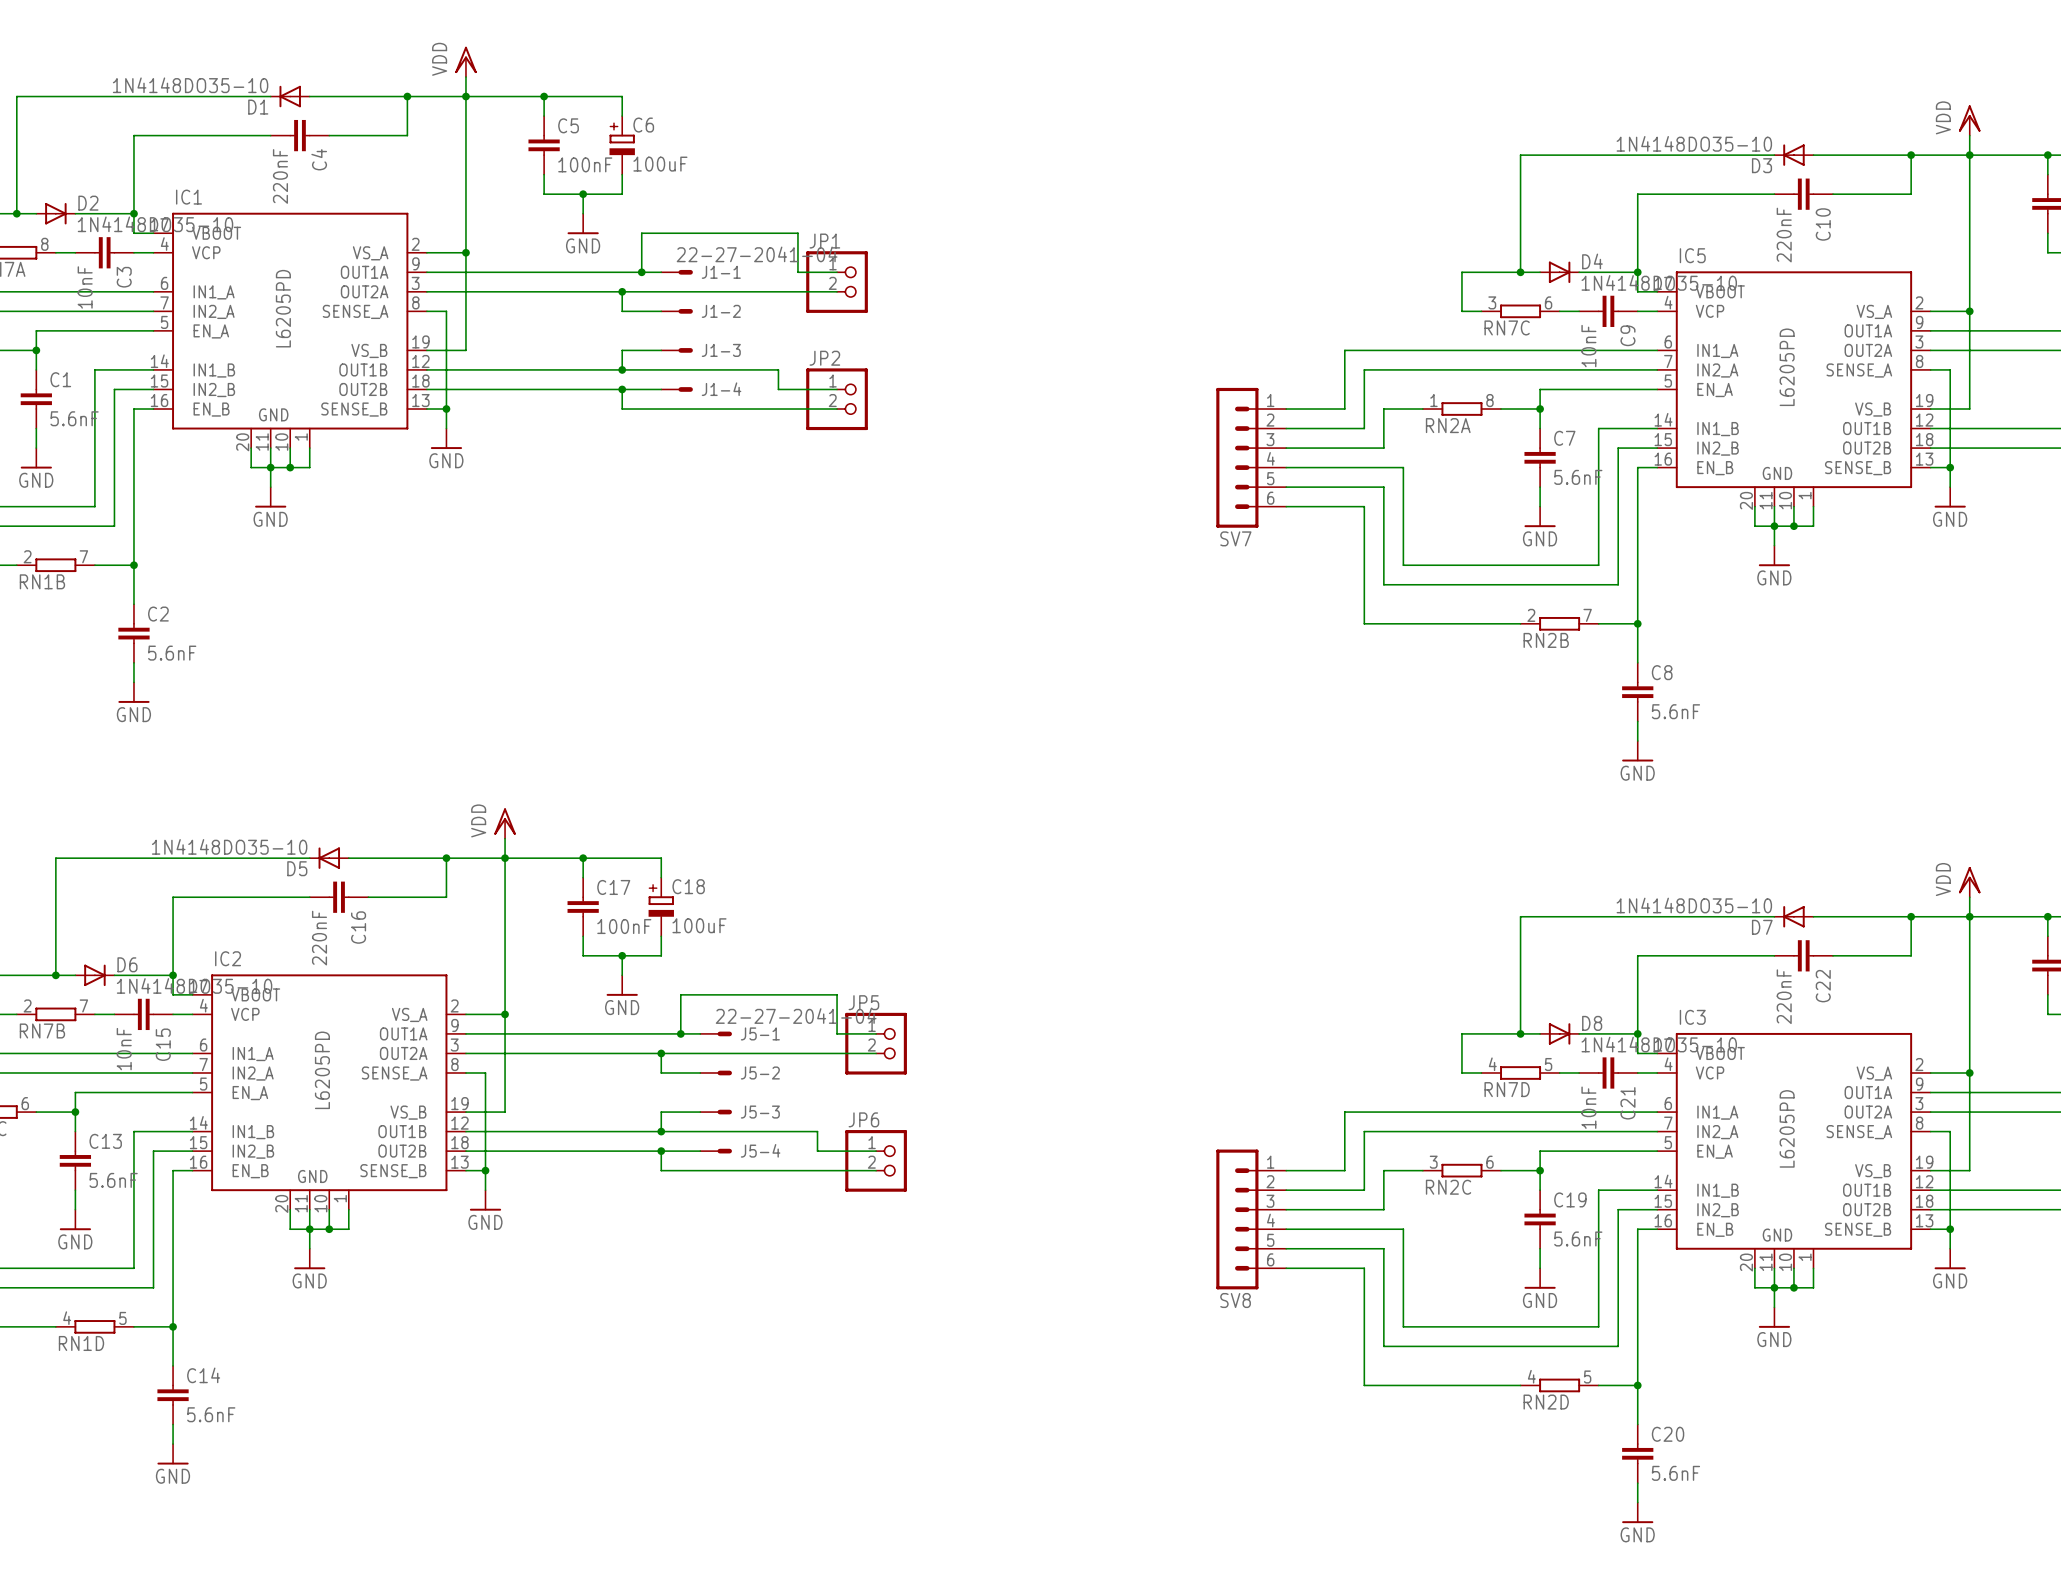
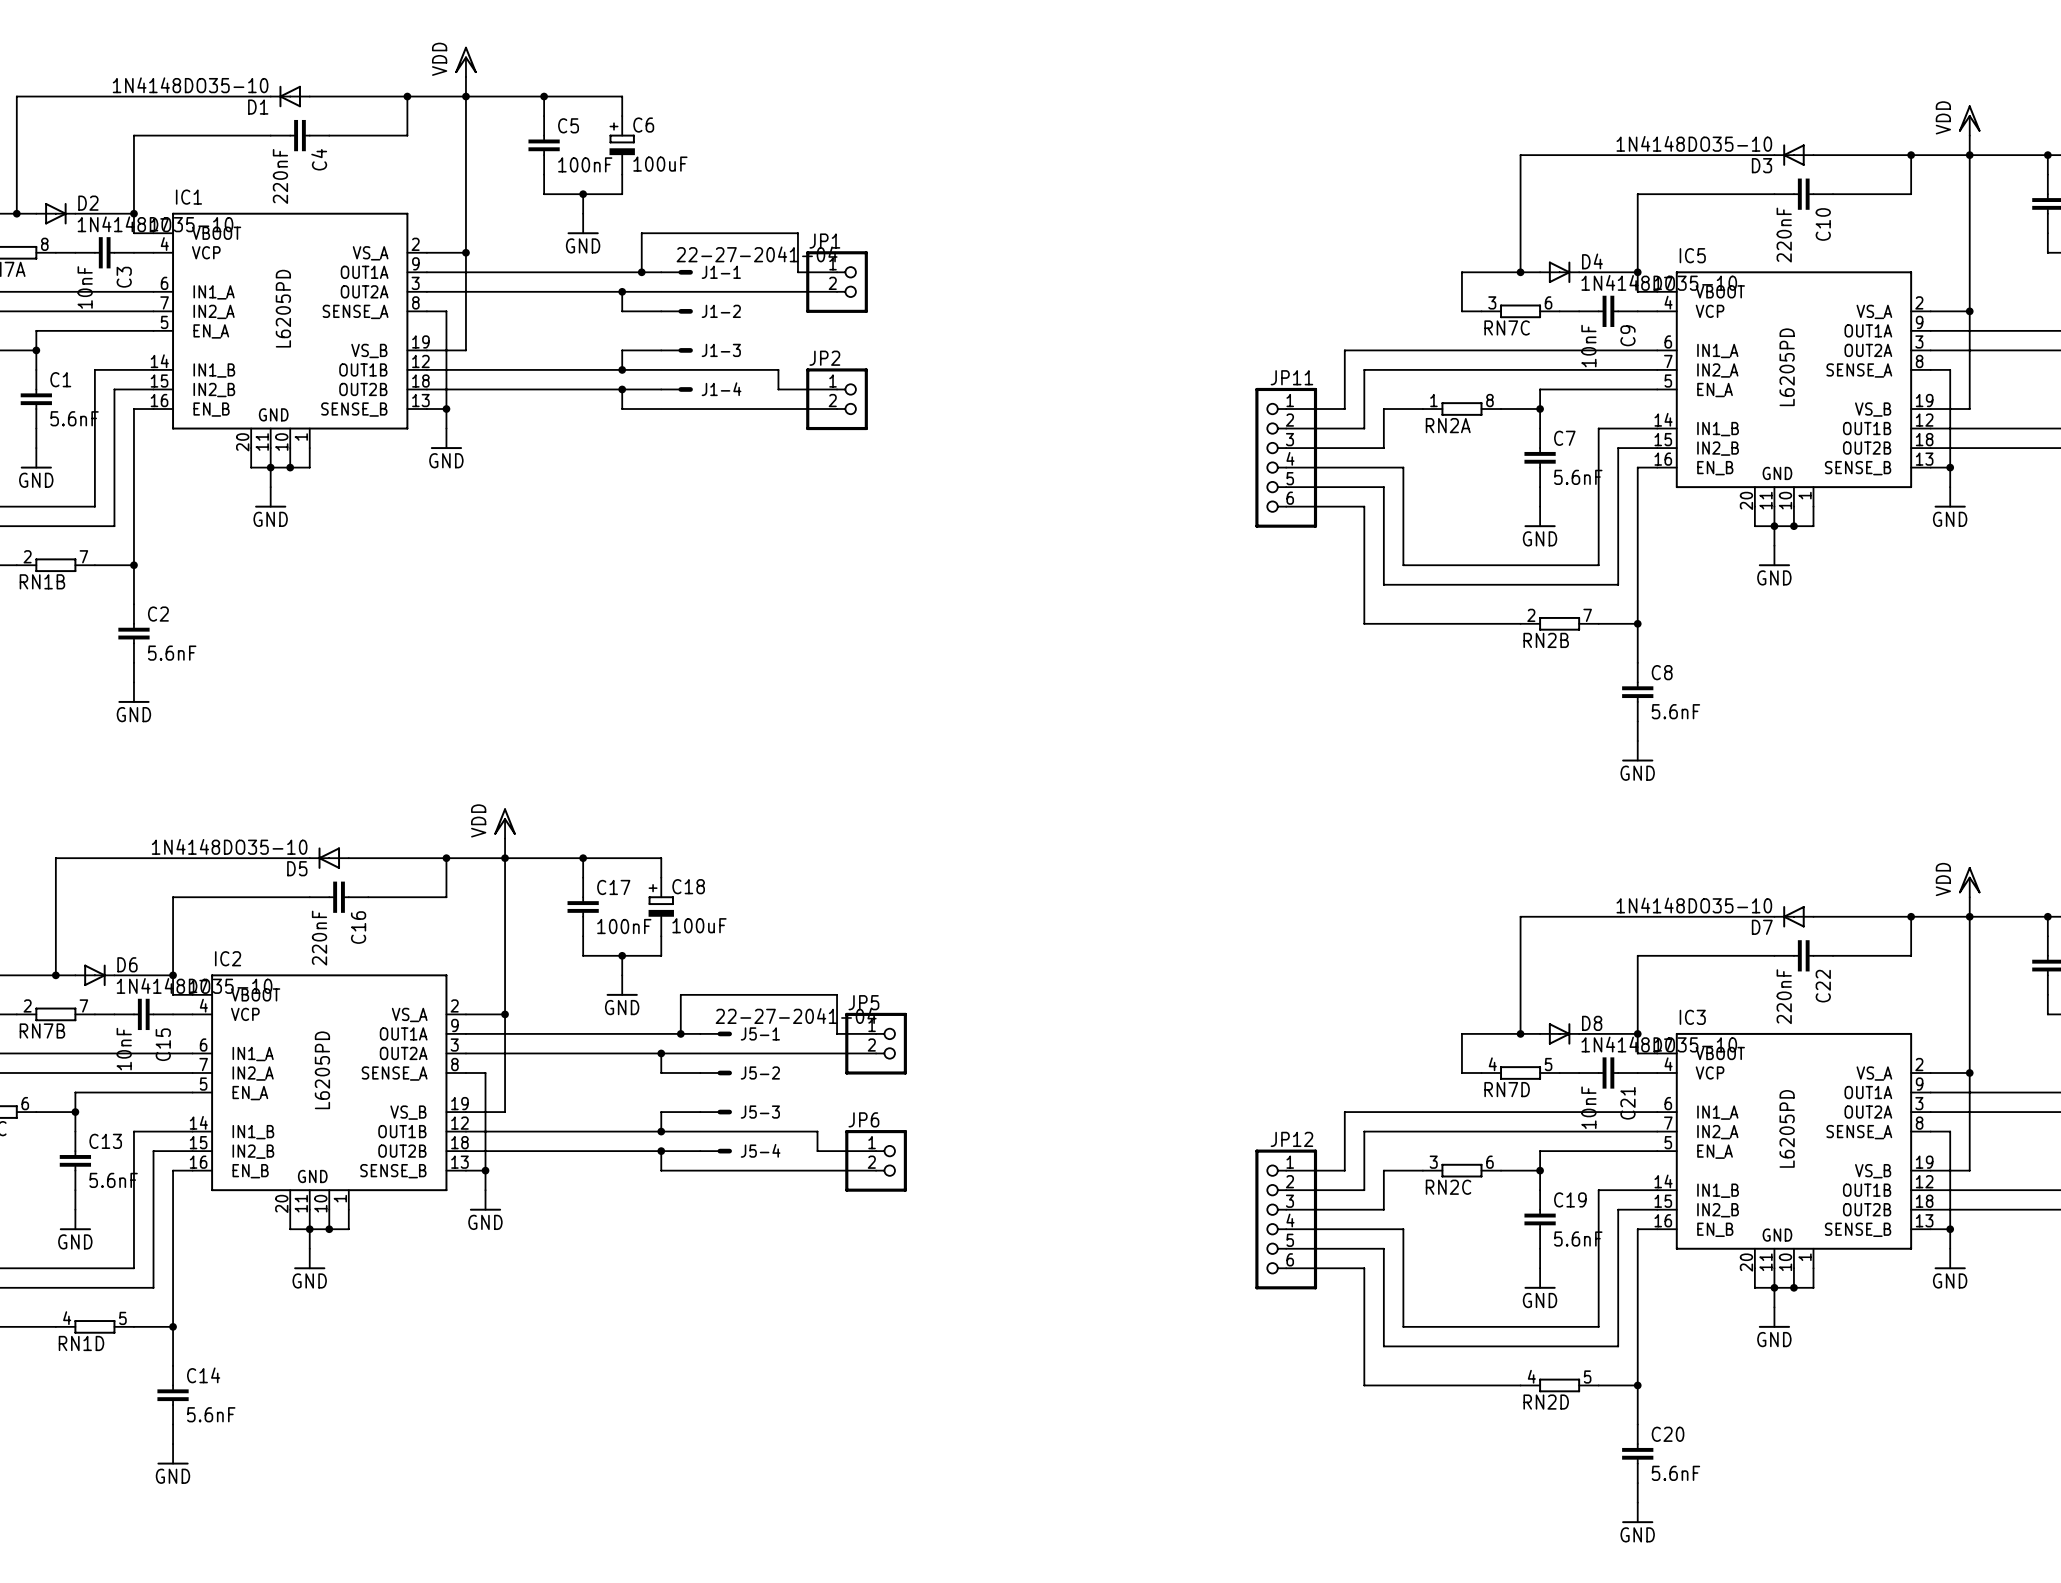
SV7: (1251, 457) -> none
JP11: none -> (1286, 457)
SV8: (1251, 1219) -> none
JP12: none -> (1286, 1219)

